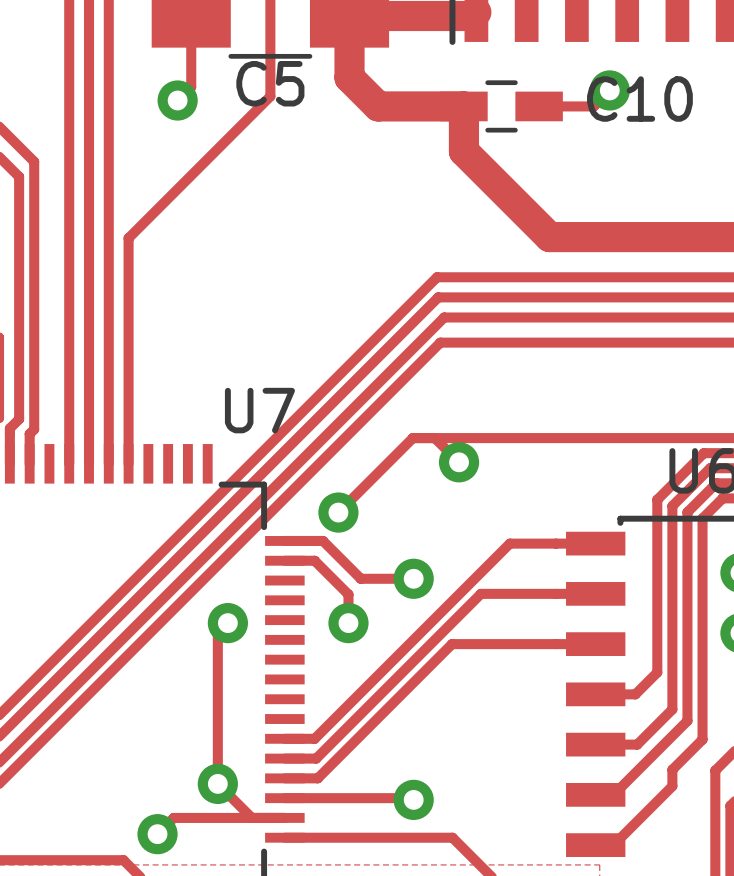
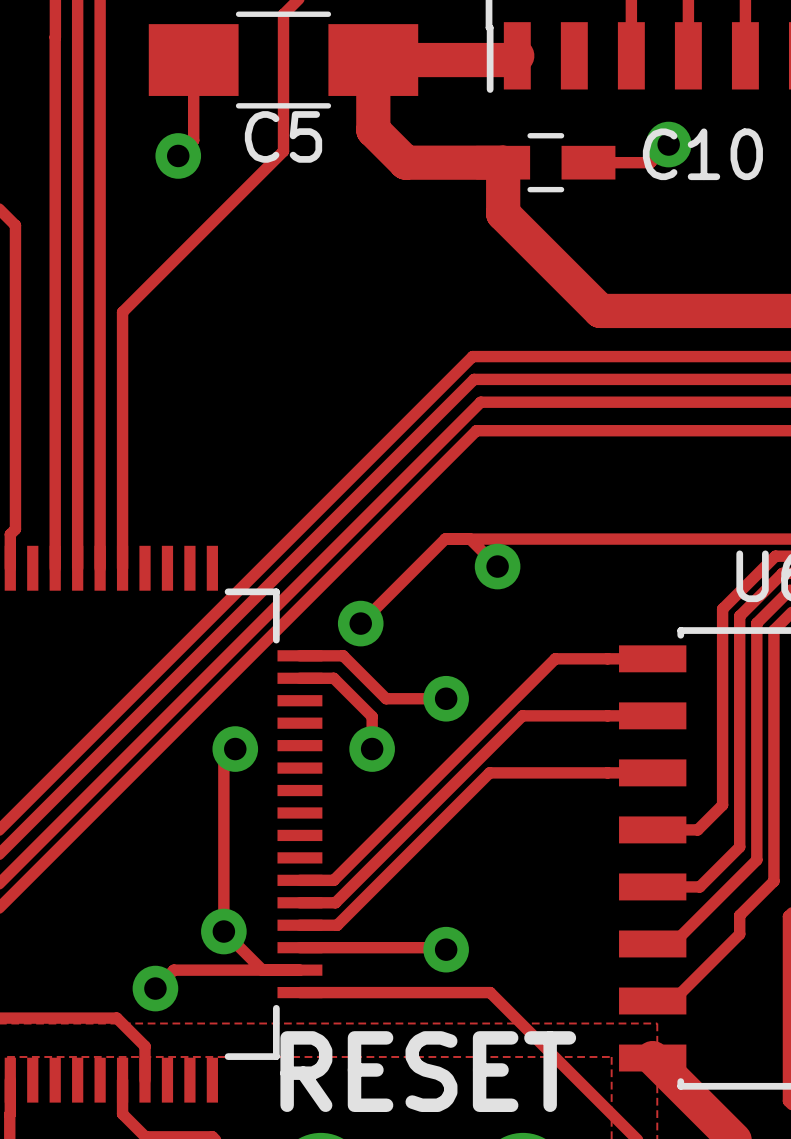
U7 name: U7 (259, 410) -> none

